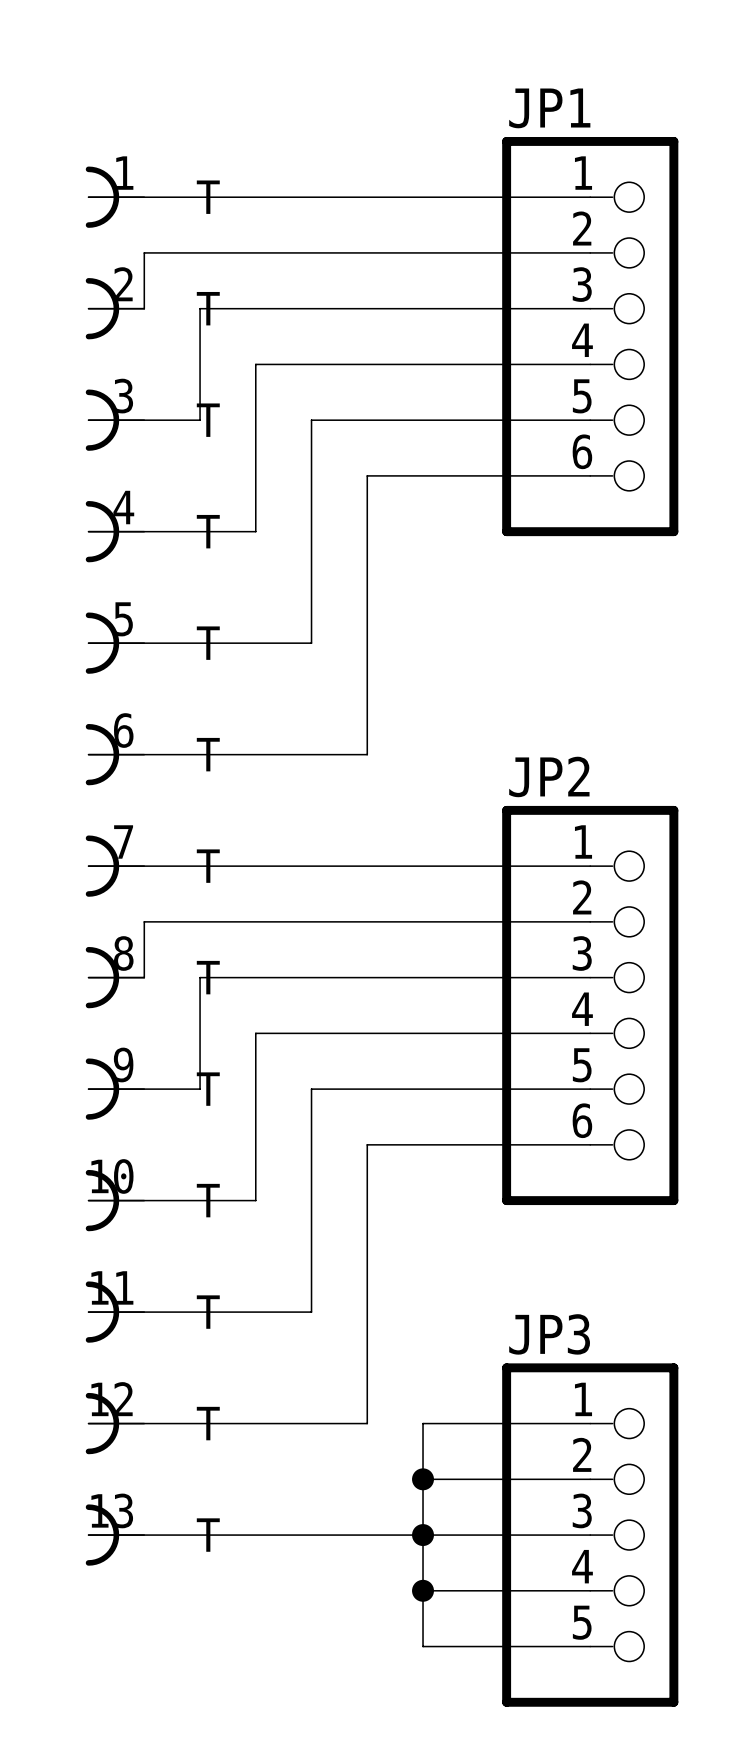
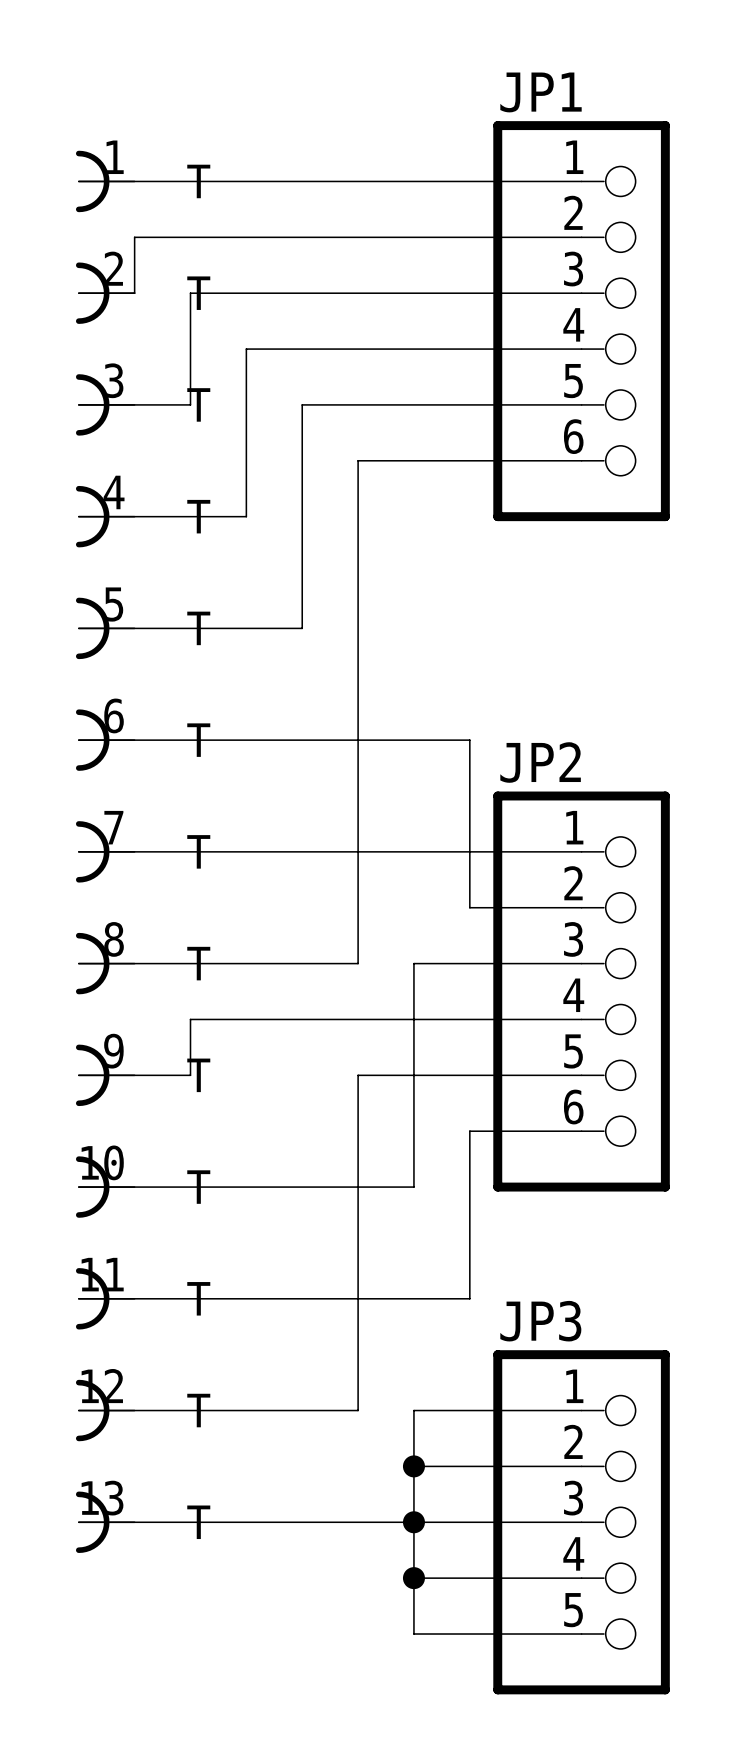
wire: (478, 921) (144, 921) (144, 977) -> (190, 963) (134, 963)
wire: (200, 977) (200, 1033) -> (246, 1019) (190, 1019)
wire: (367, 977) (423, 977) -> (358, 963) (358, 740) (469, 740) (469, 907)
wire: (255, 1033) (255, 1200) -> (413, 963) (413, 1187) (246, 1187)
wire: (367, 1089) (311, 1089) (311, 1312) -> (469, 1131) (469, 1298) (302, 1298)
wire: (367, 1144) (478, 1144) -> (358, 1131) (358, 1075)

